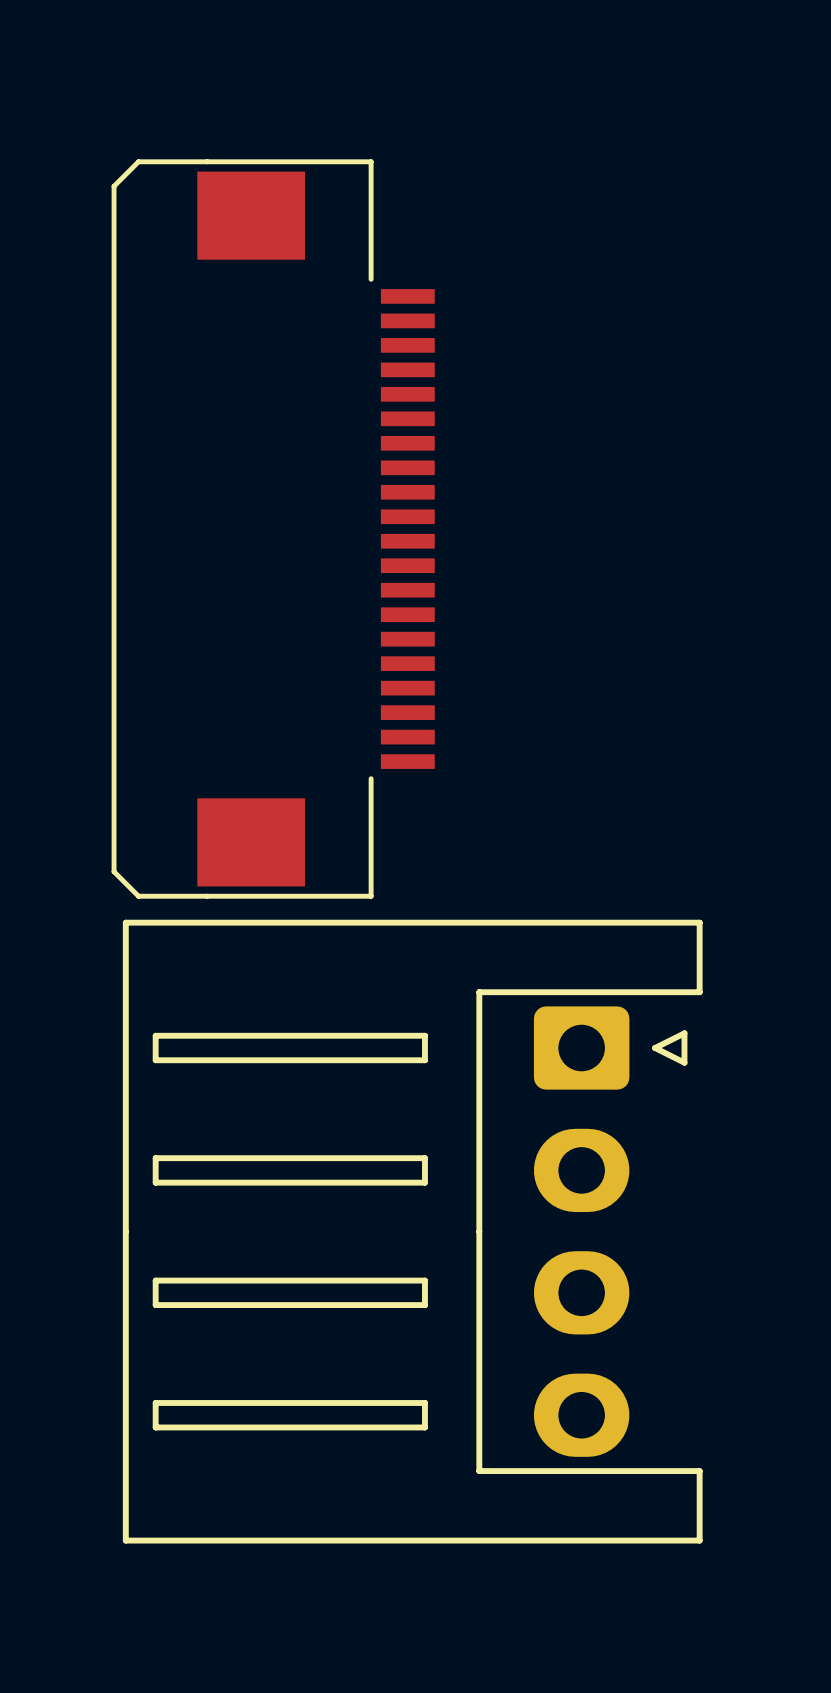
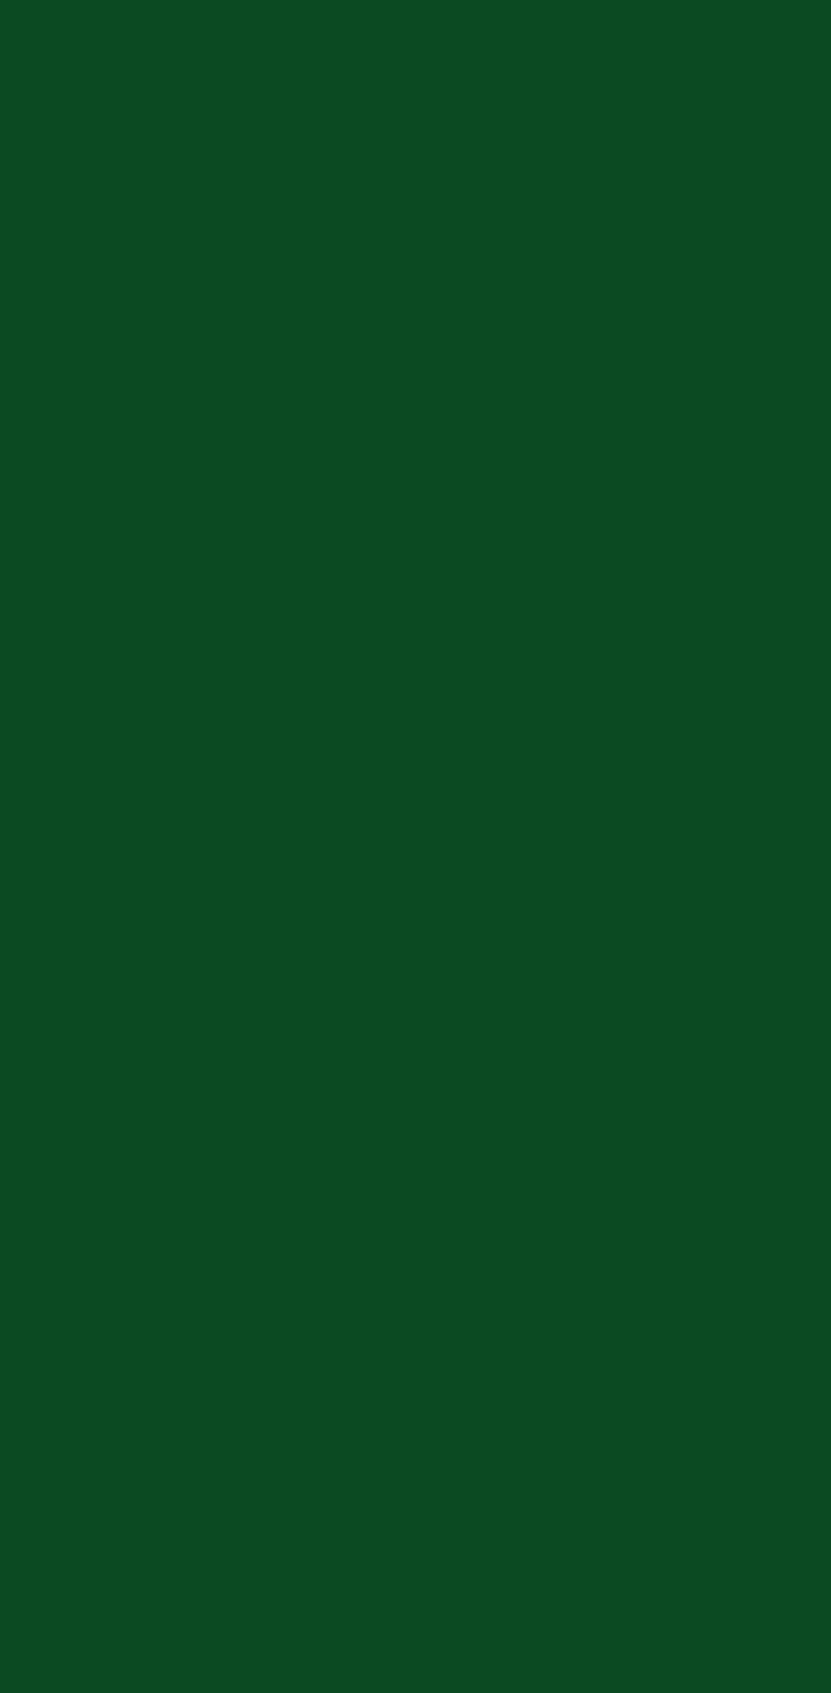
part: (273, 529) -> none
part: (412, 1231) -> none

